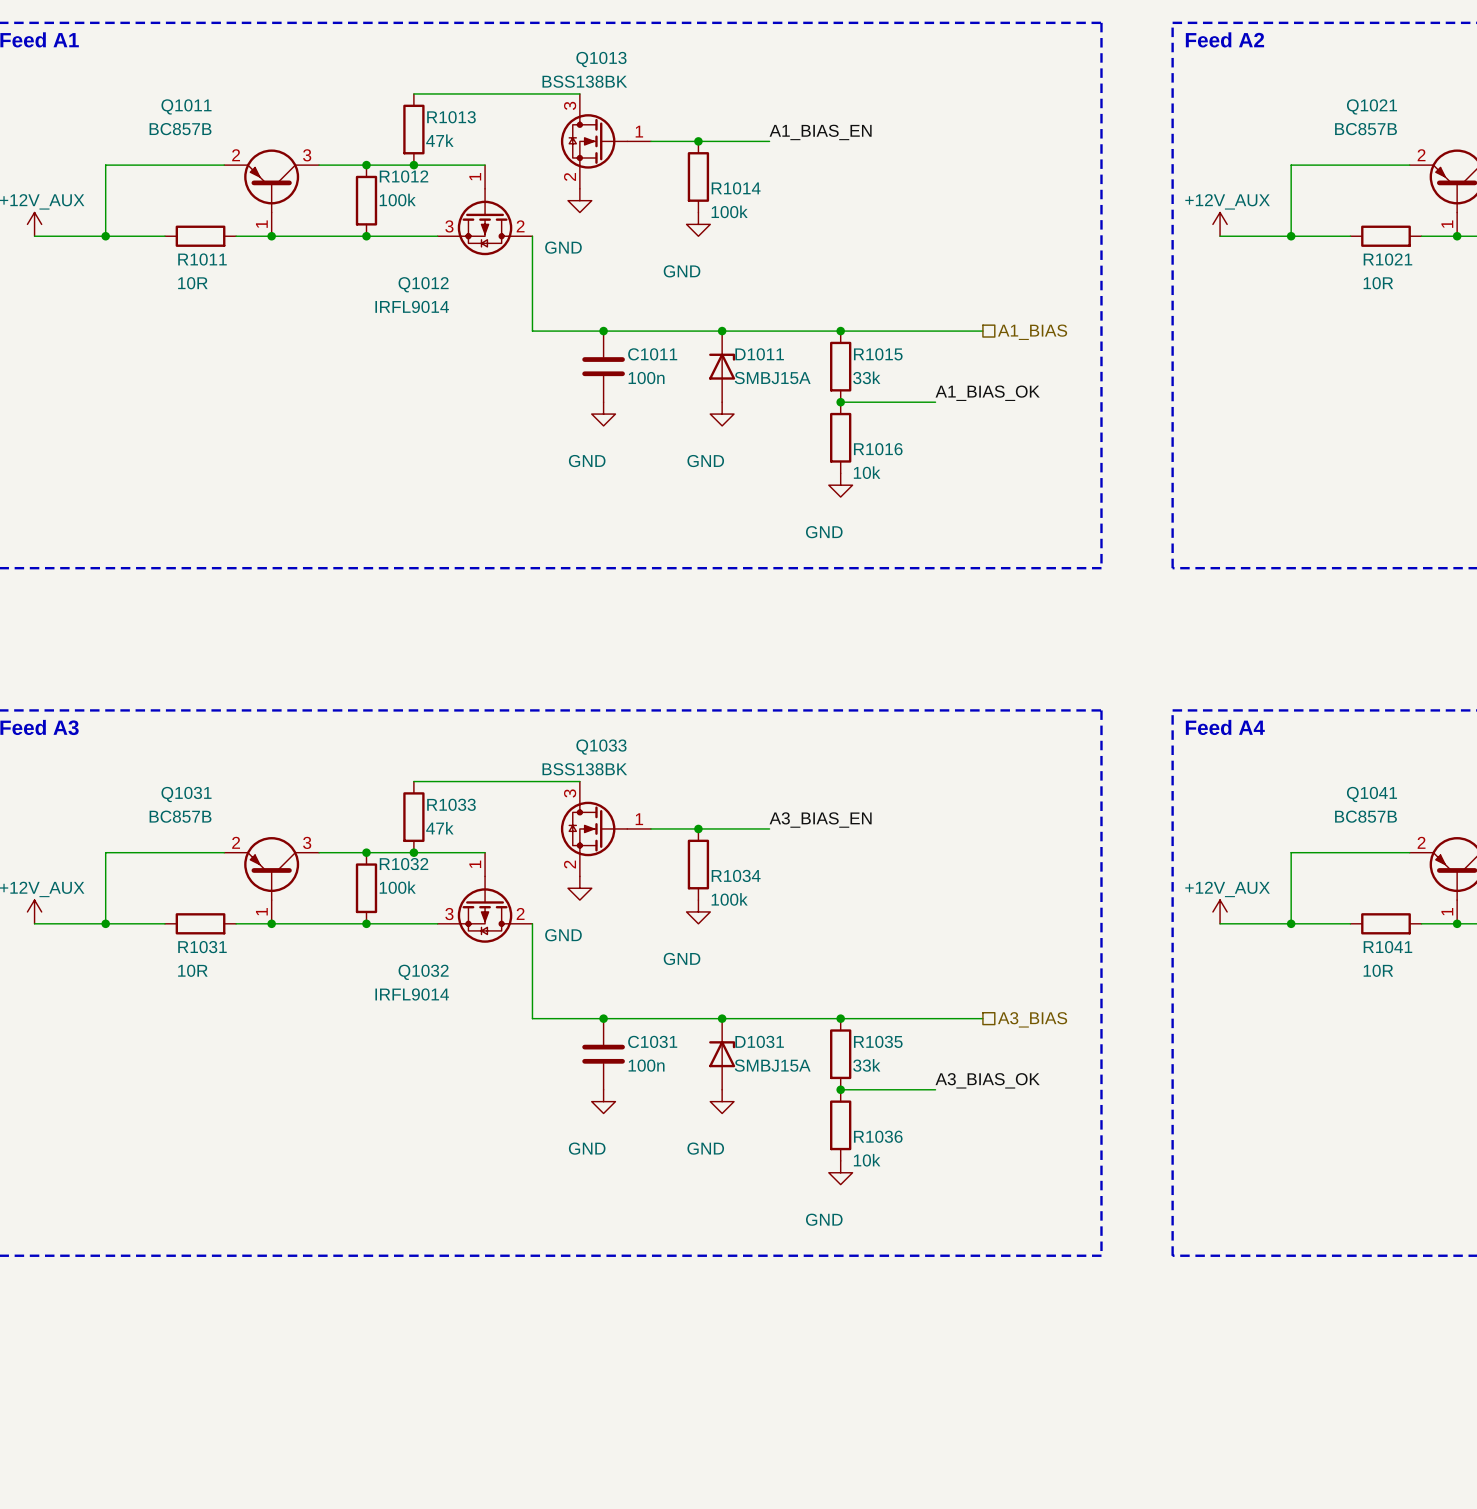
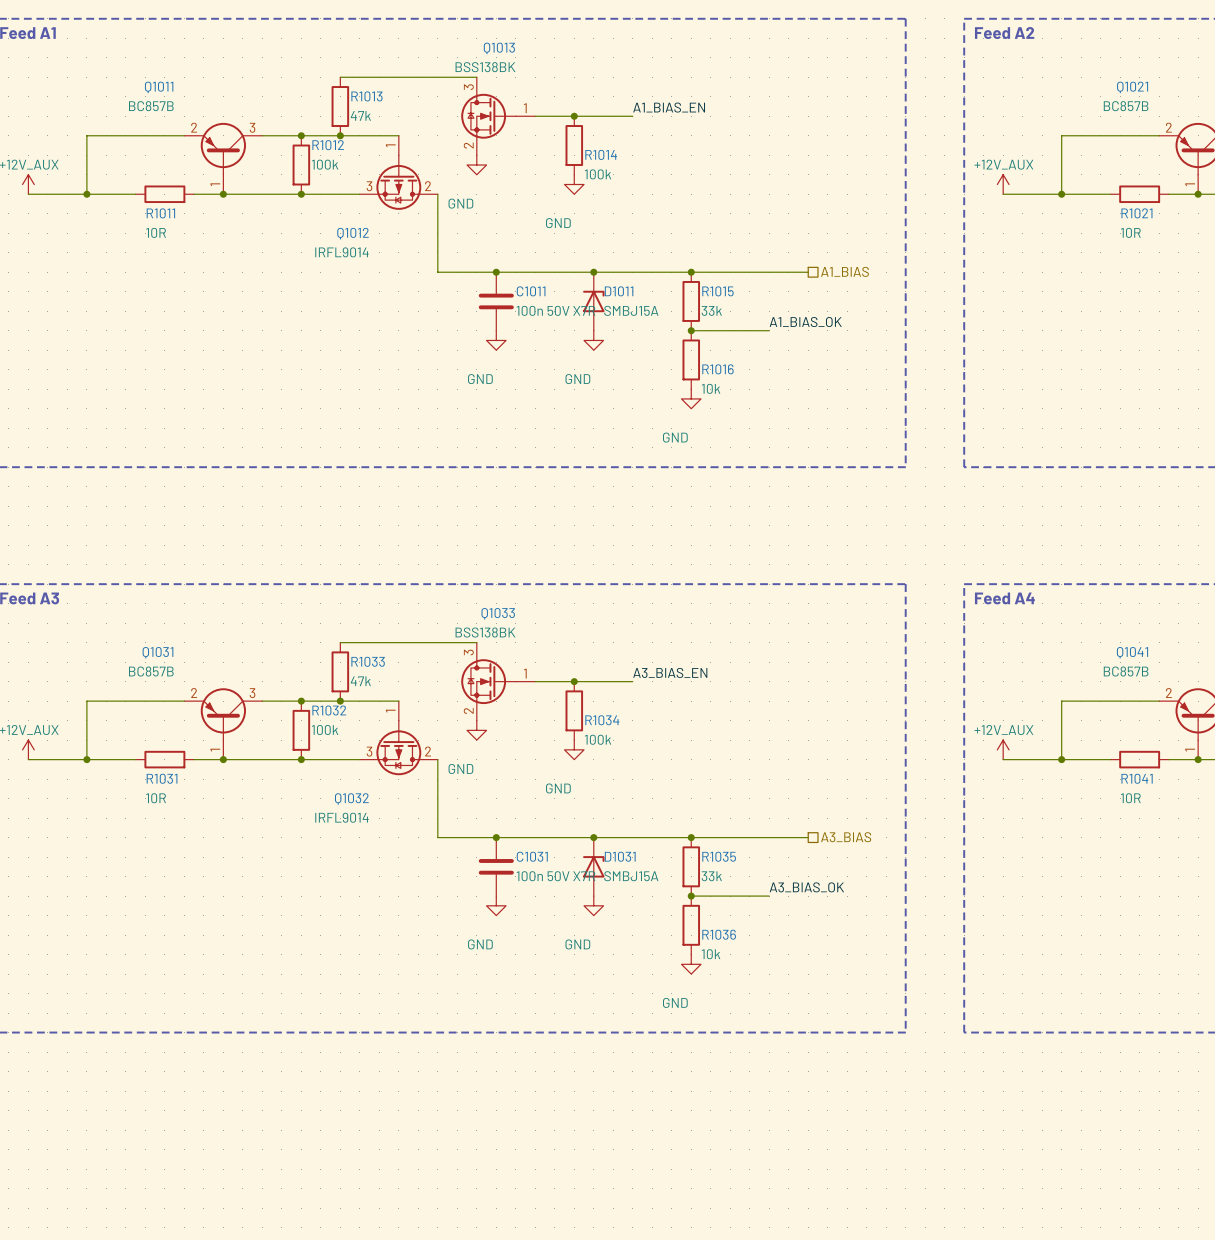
C1011 value: 100n (646, 378) -> 100n 50V X7R (555, 310)
C1031 value: 100n (646, 1065) -> 100n 50V X7R (555, 876)

